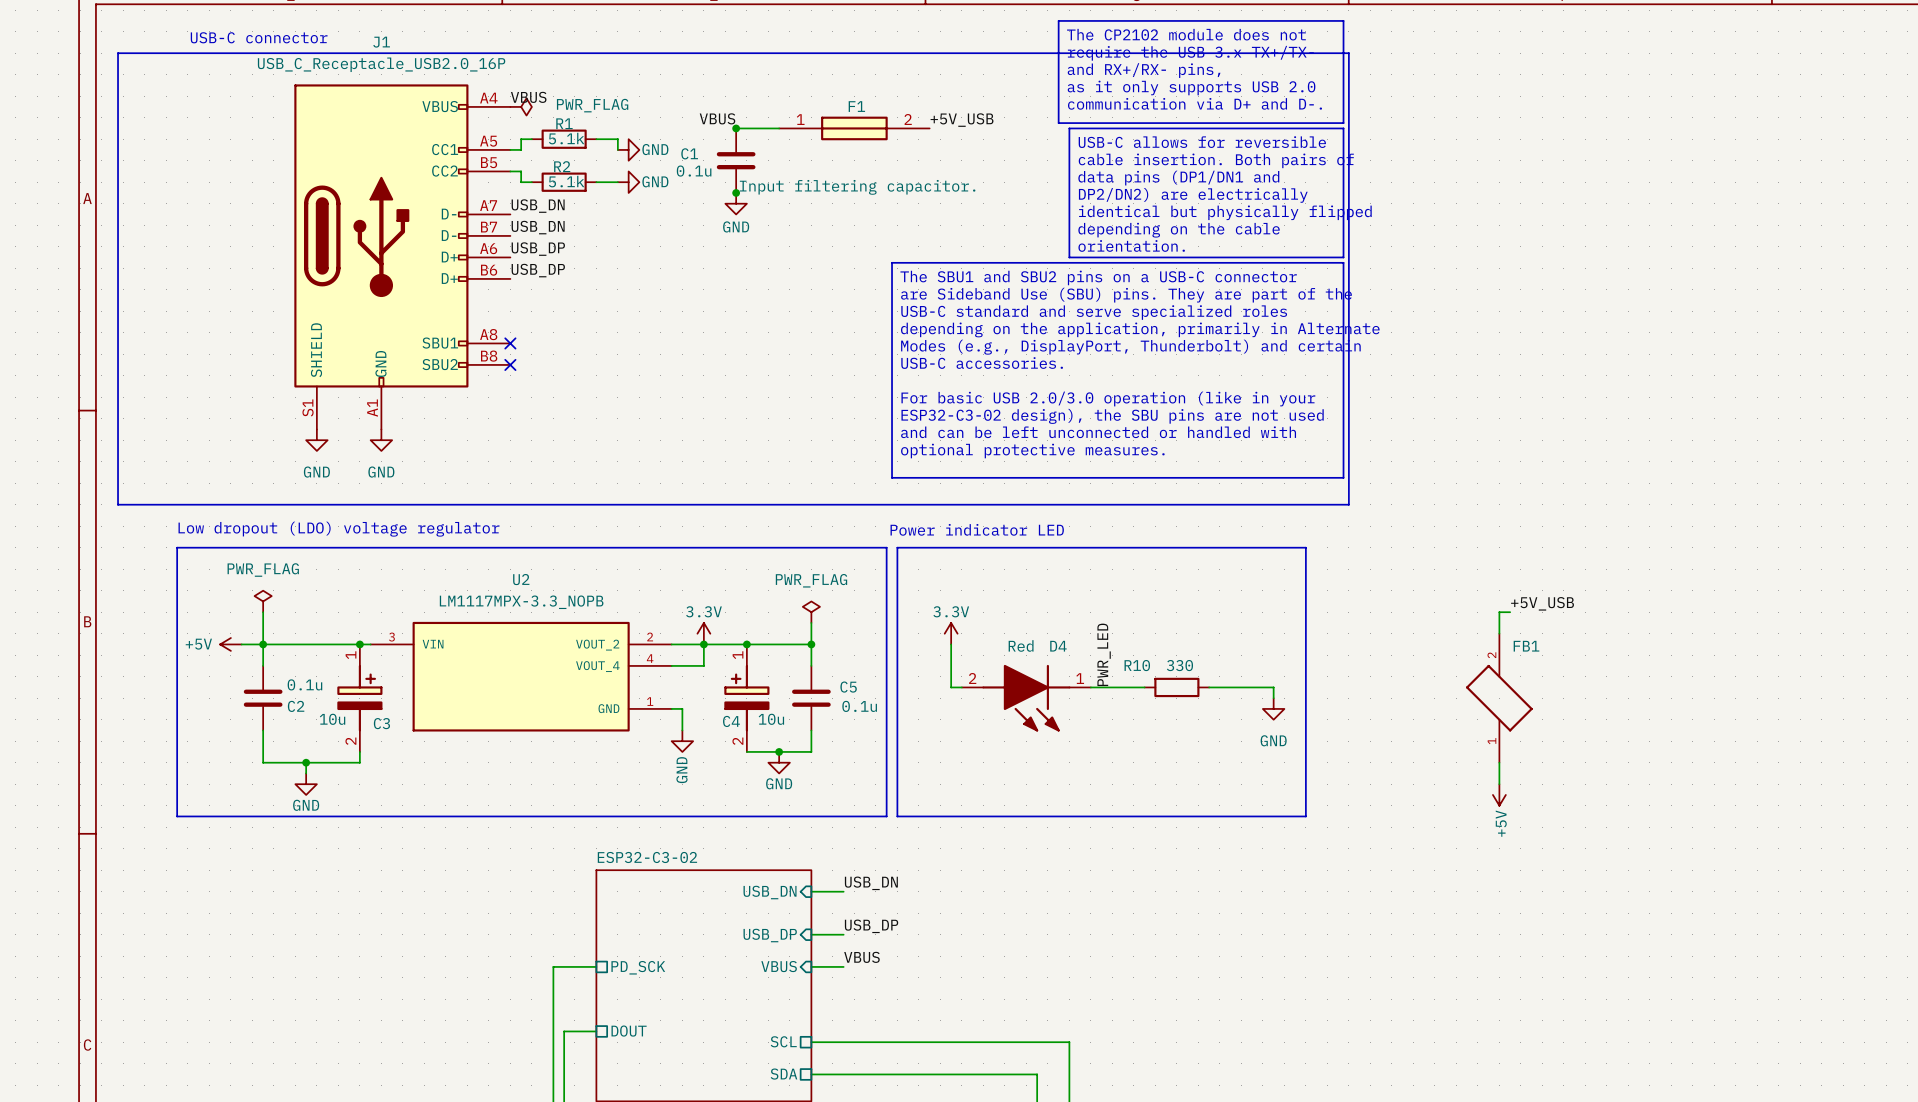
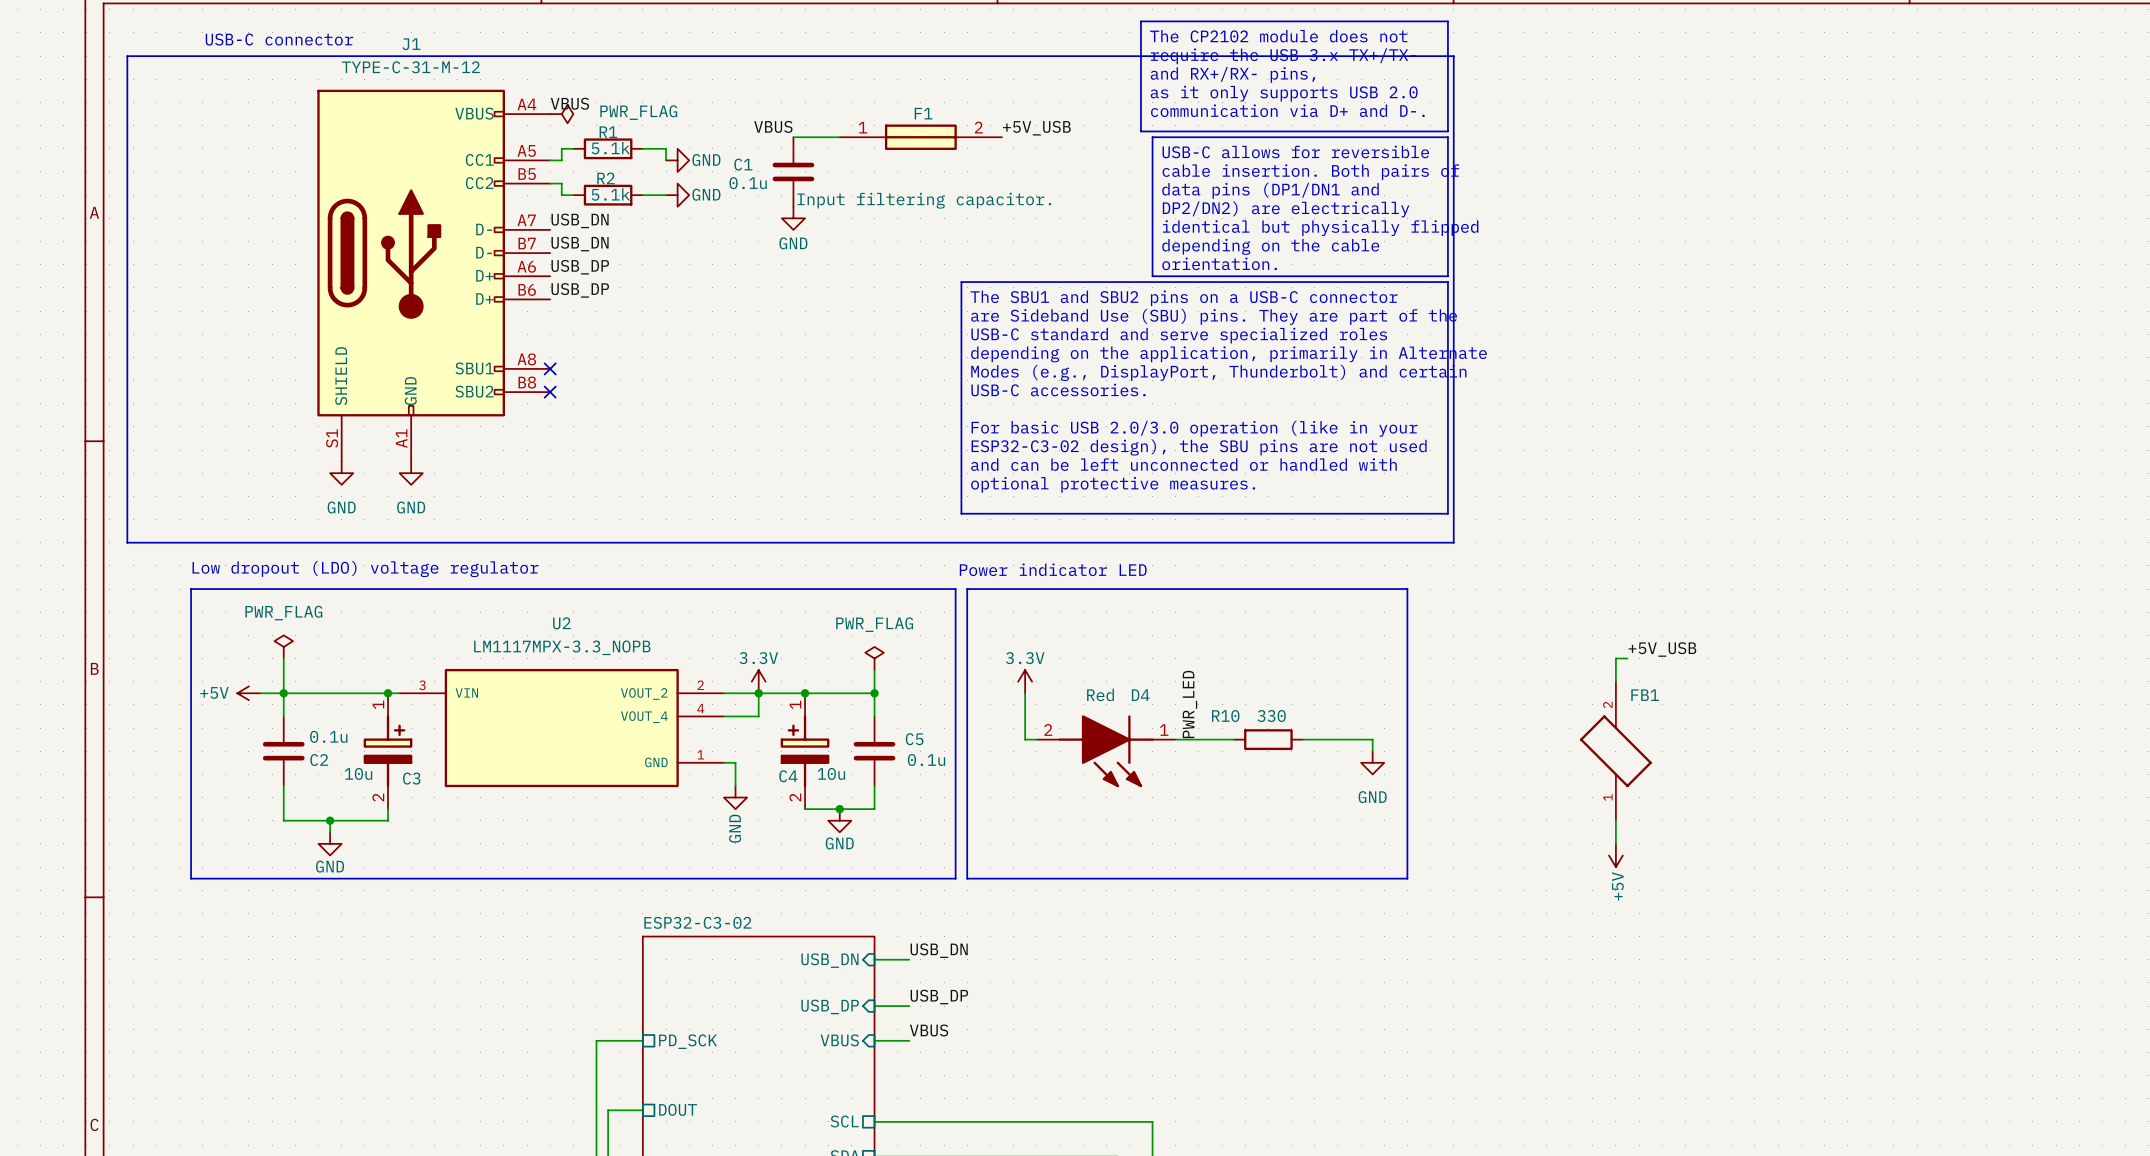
J1 value: USB_C_Receptacle_USB2.0_16P (381, 64) -> TYPE-C-31-M-12 (410, 67)
junction: (736, 128) -> none
junction: (736, 192) -> none

